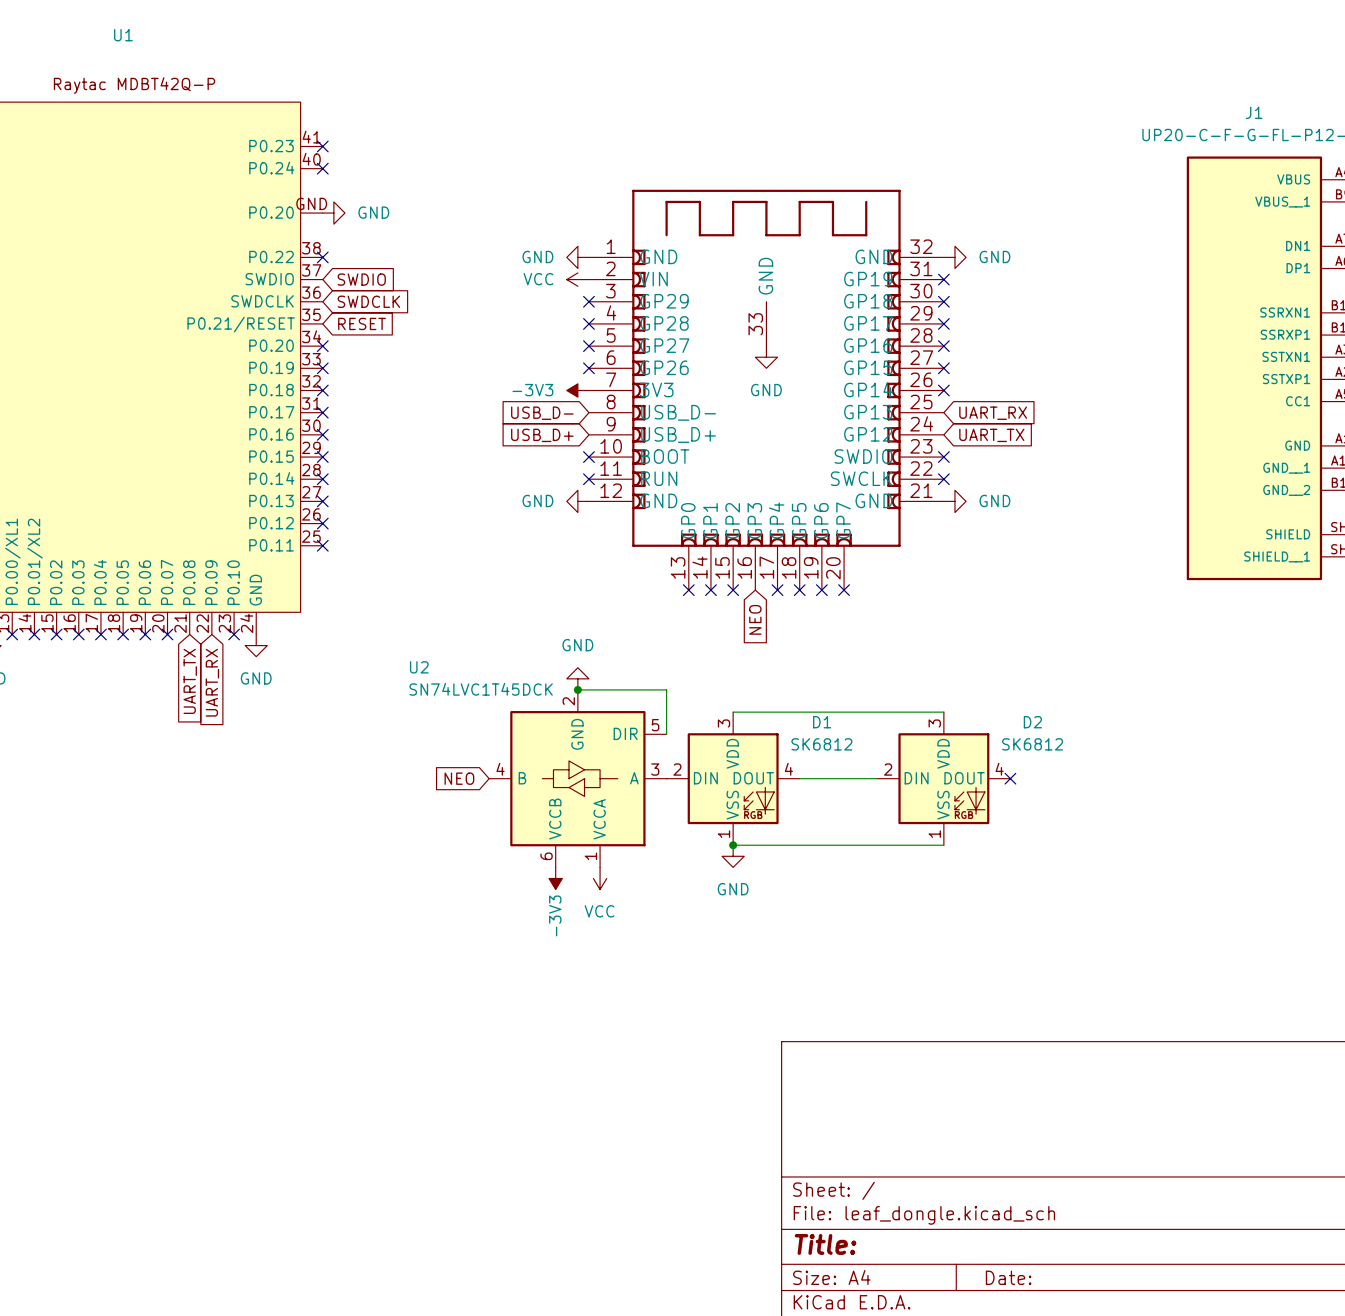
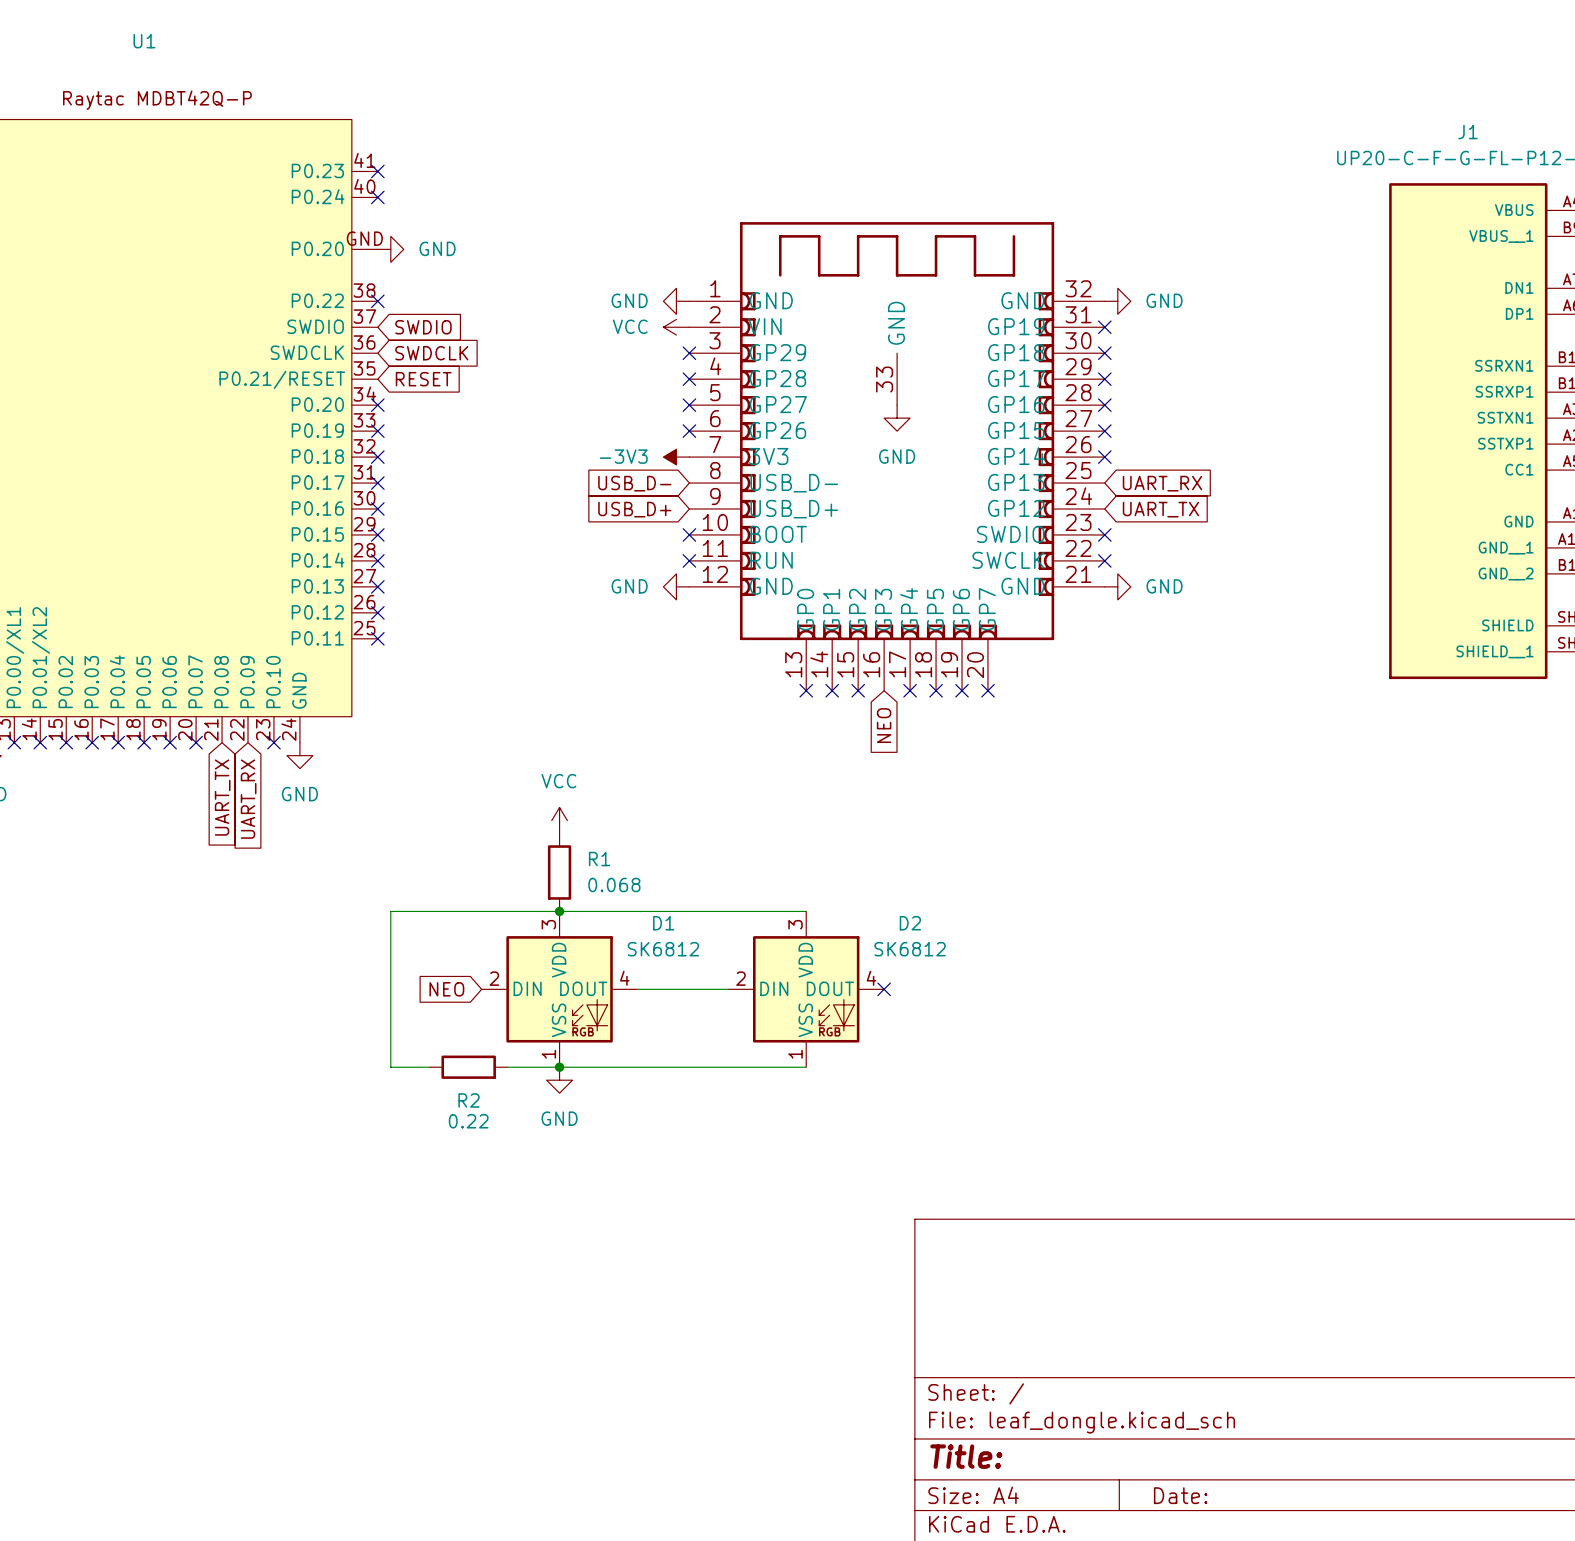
power symbol: GND (577, 678) -> none
wire: (577, 689) (666, 689) (666, 734) -> none
junction: (577, 689) -> none
wire: (733, 712) (943, 712) -> none
R1: none -> 0.068 (559, 872)
global label position: NEO (459, 778) -> NEO (446, 989)
junction: none -> (559, 911)
U2: SN74LVC1T45DCK (577, 778) -> none
wire: none -> (806, 911) (390, 911) (390, 1067) (429, 1067)
D1 position: (733, 778) -> (559, 989)
wire: (799, 778) (877, 778) -> none
D2 position: (943, 778) -> (806, 989)
no-connect mark: (1010, 778) -> none
wire: (733, 845) (943, 845) -> none
junction: (733, 845) -> none
no-connect mark: none -> (884, 989)
power symbol: GND (733, 856) -> none
power symbol: -3V3 (555, 878) -> none
power symbol rotation: 0° (600, 878) -> 180° (559, 820)
power symbol position: VCC (600, 878) -> VCC (559, 820)
R2: none -> 0.22 (468, 1067)
wire: none -> (507, 1067) (806, 1067)
junction: none -> (559, 1067)
power symbol: none -> GND (559, 1080)

